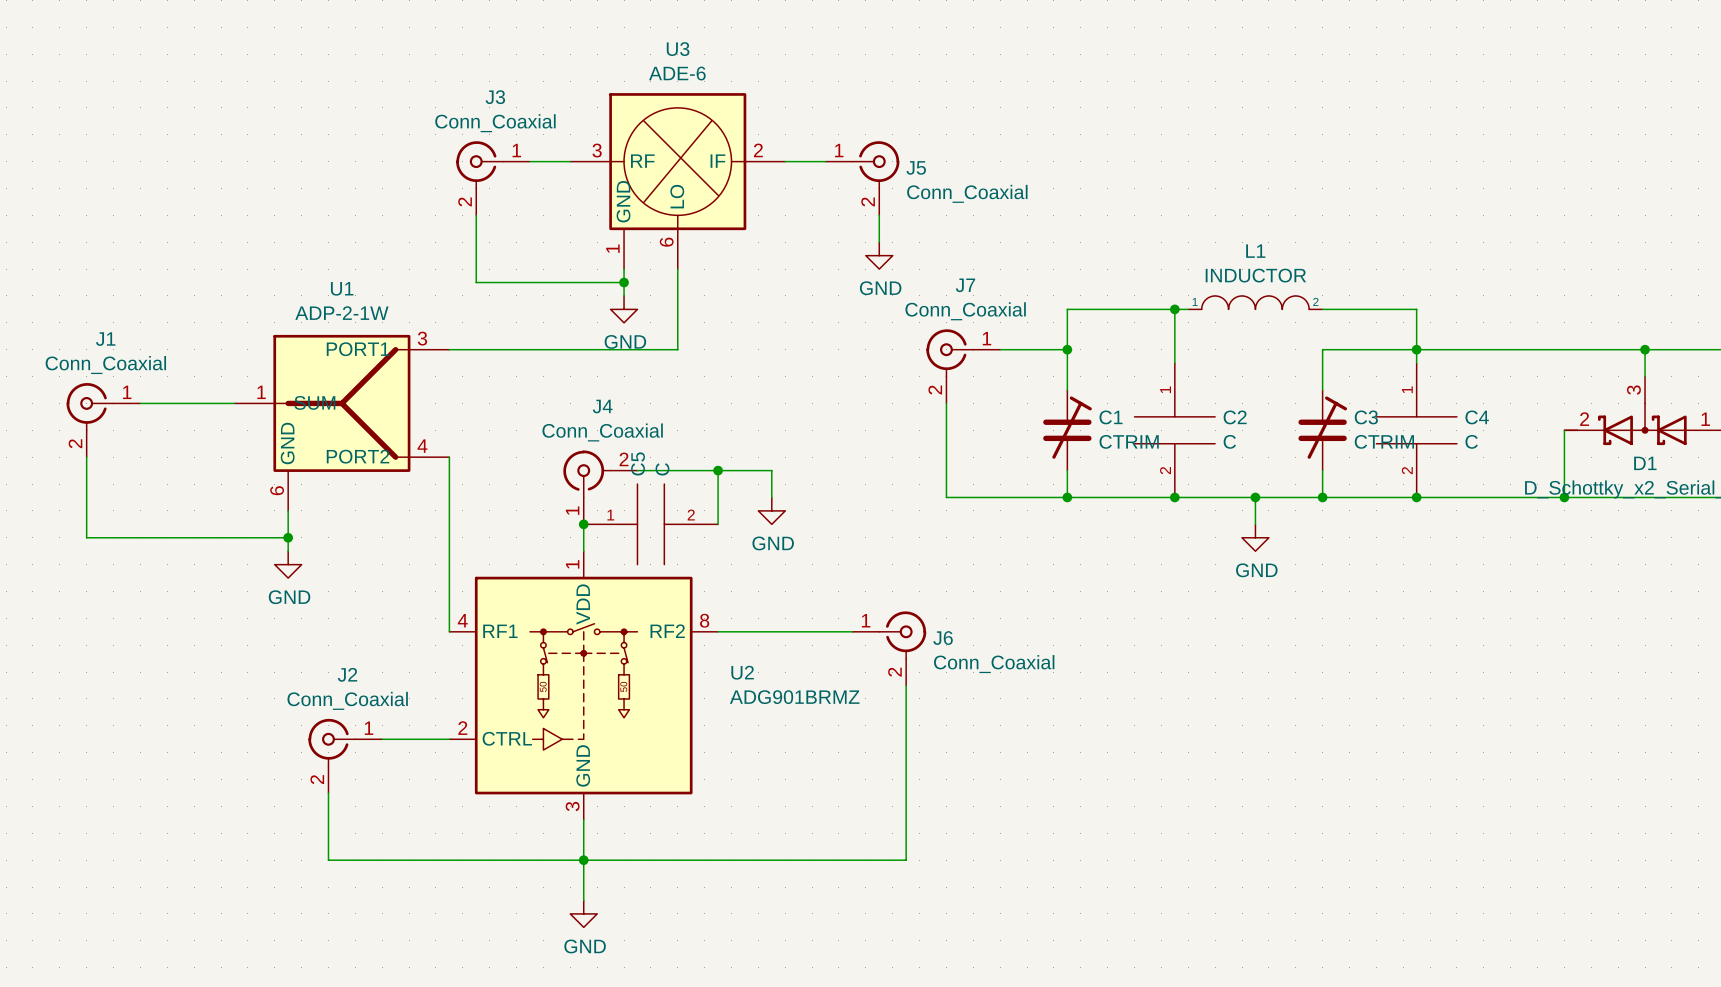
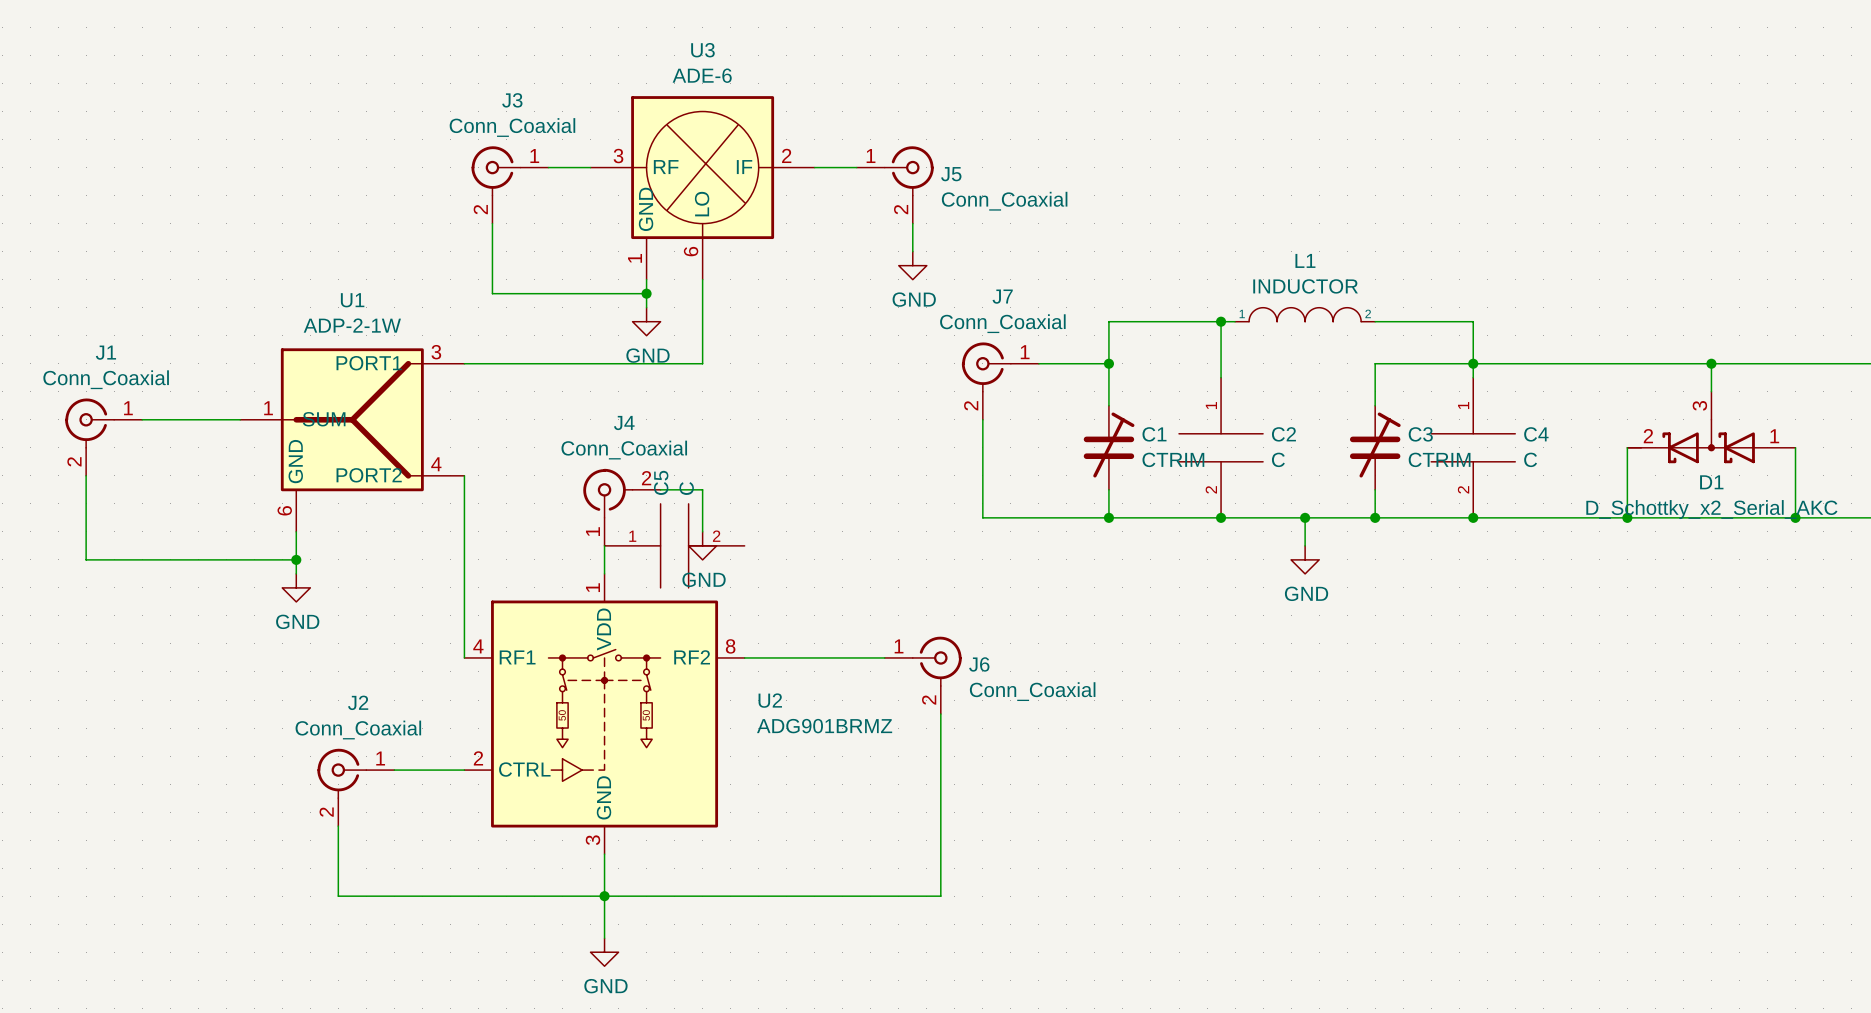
wire: (677, 470) (771, 470) (771, 497) -> (702, 489) (702, 531)
wire: (718, 470) (718, 524) -> none
junction: (718, 470) -> none
power symbol position: GND (771, 510) -> GND (702, 545)
junction: (583, 524) -> none

